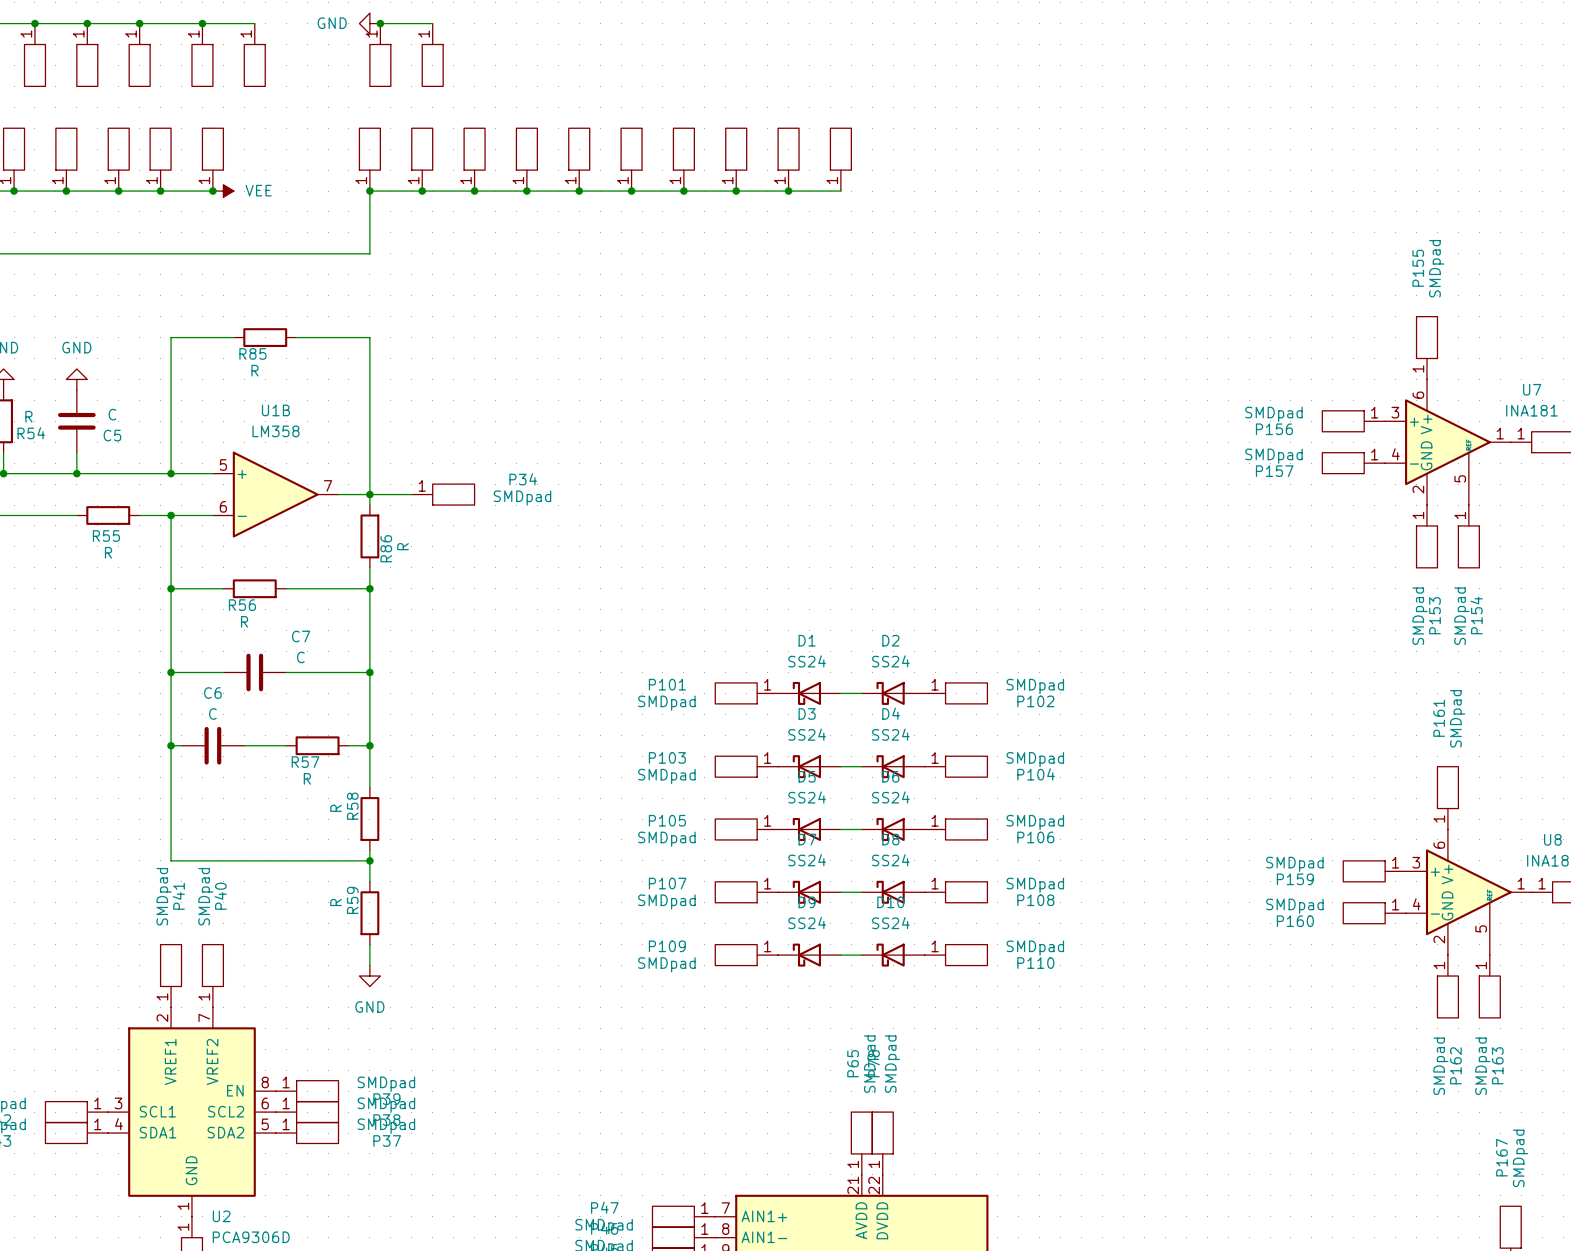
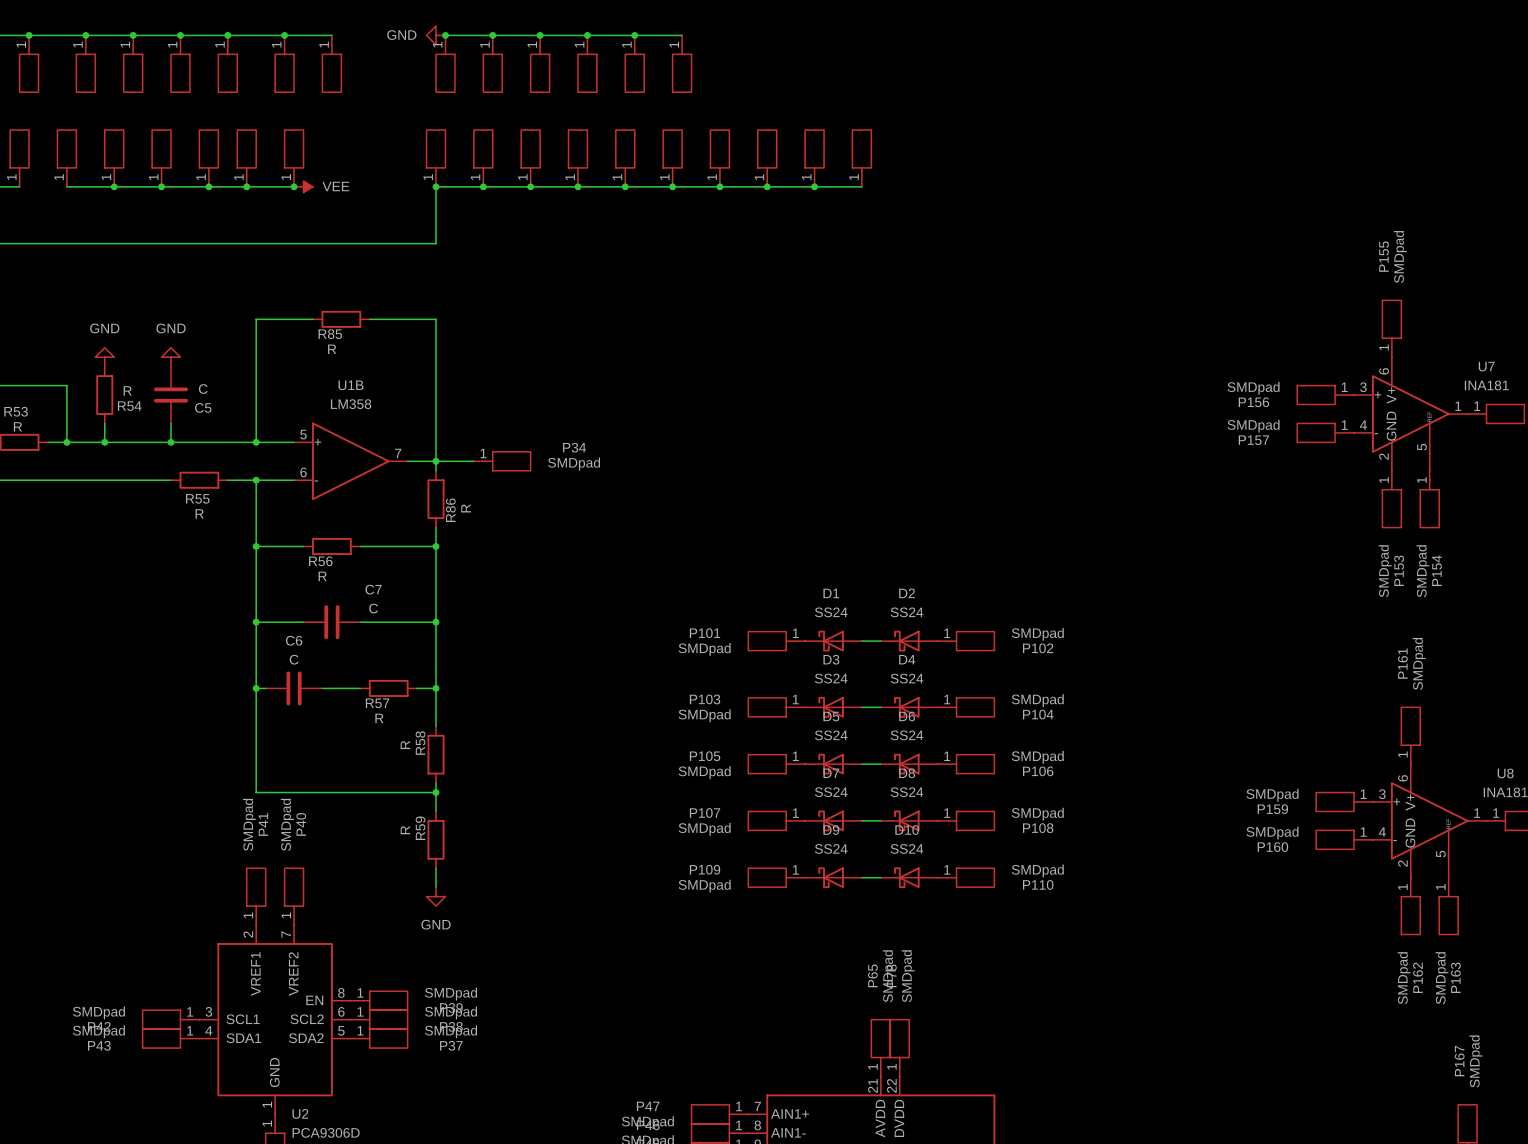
wire: none -> (492, 35) (682, 35)
junction: none -> (492, 35)
junction: none -> (540, 35)
junction: none -> (587, 35)
junction: none -> (634, 35)
part: none -> (540, 63)
part: none -> (587, 63)
part: none -> (634, 63)
part: none -> (682, 63)

